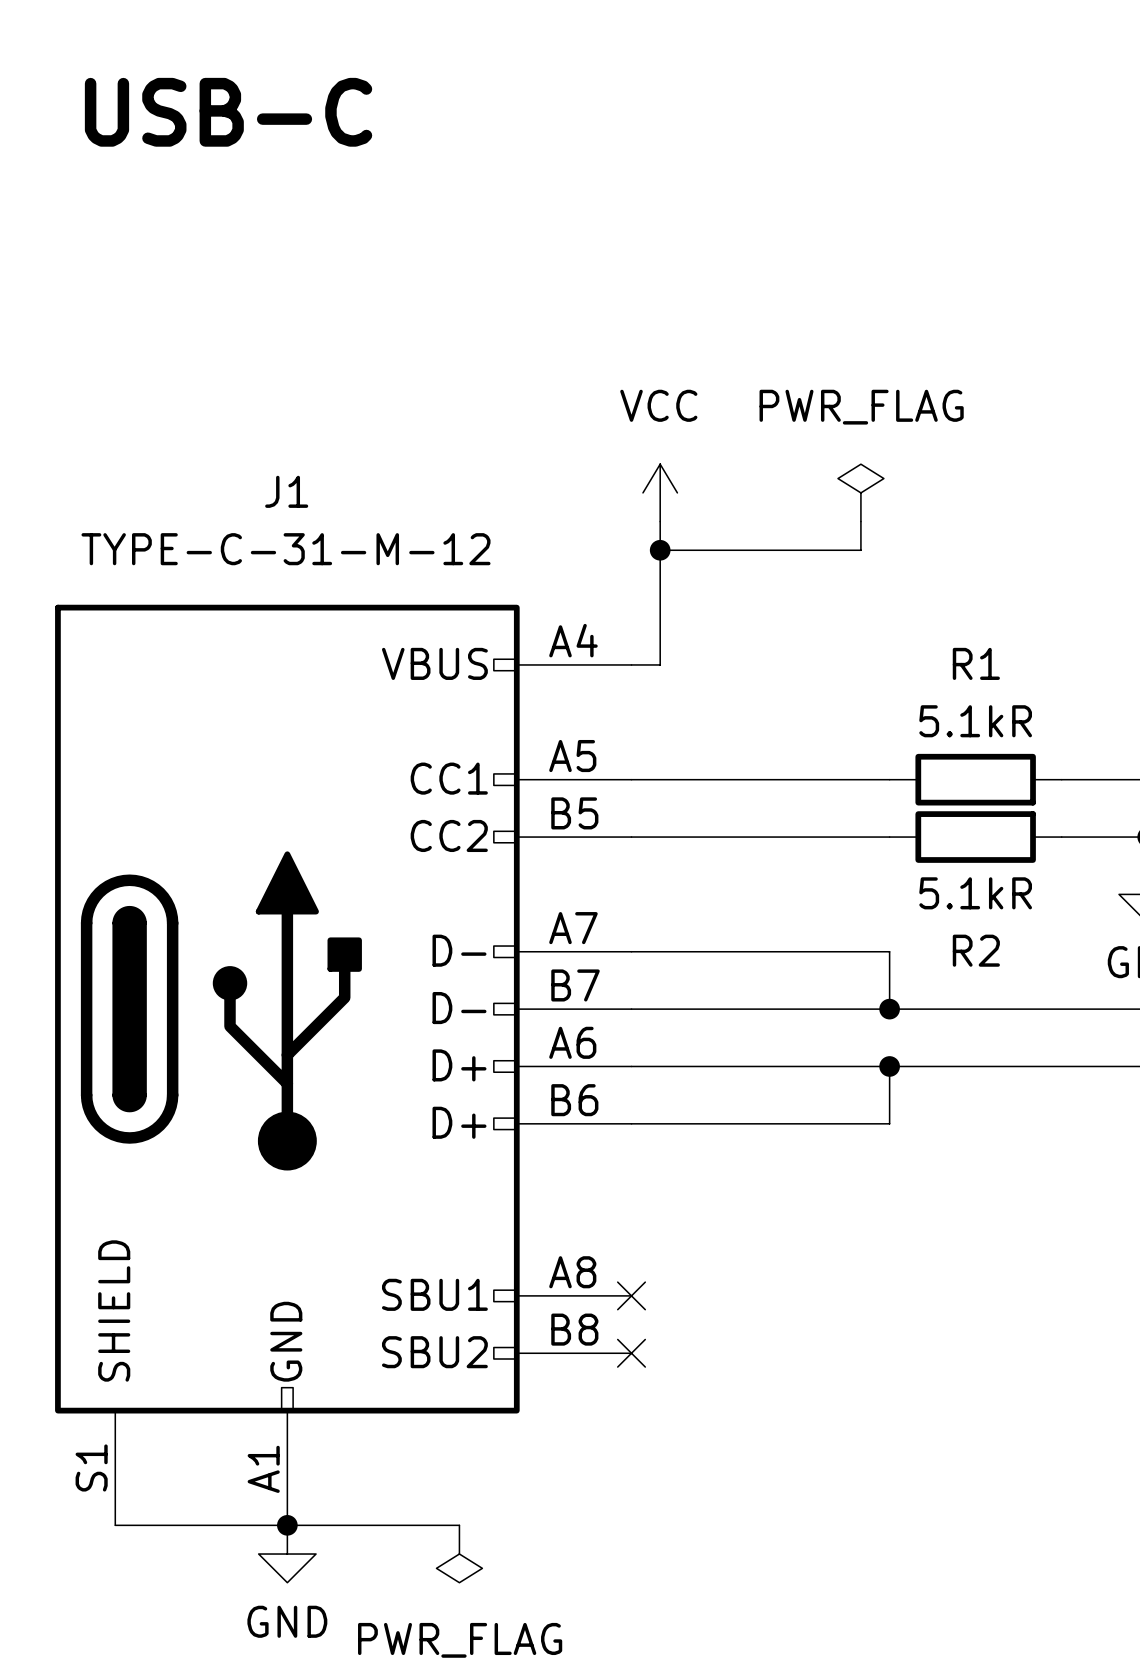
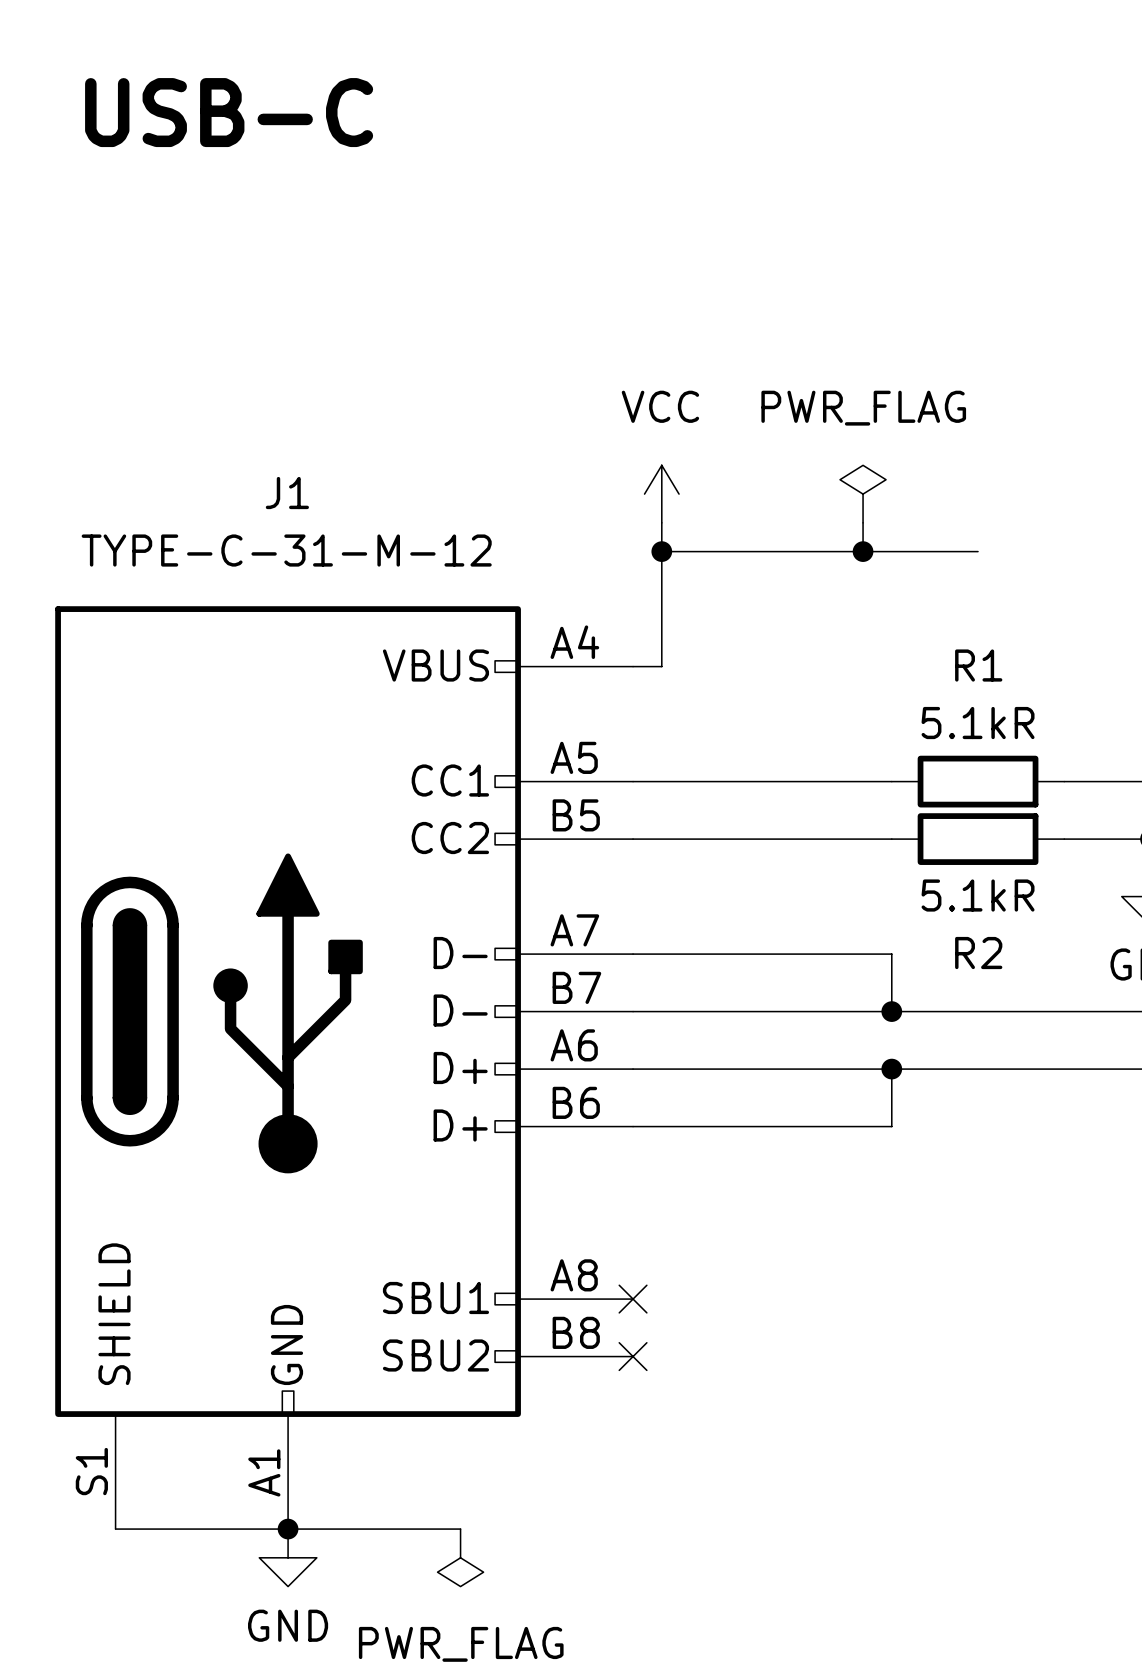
wire: none -> (863, 551) (978, 551)
junction: none -> (863, 551)

